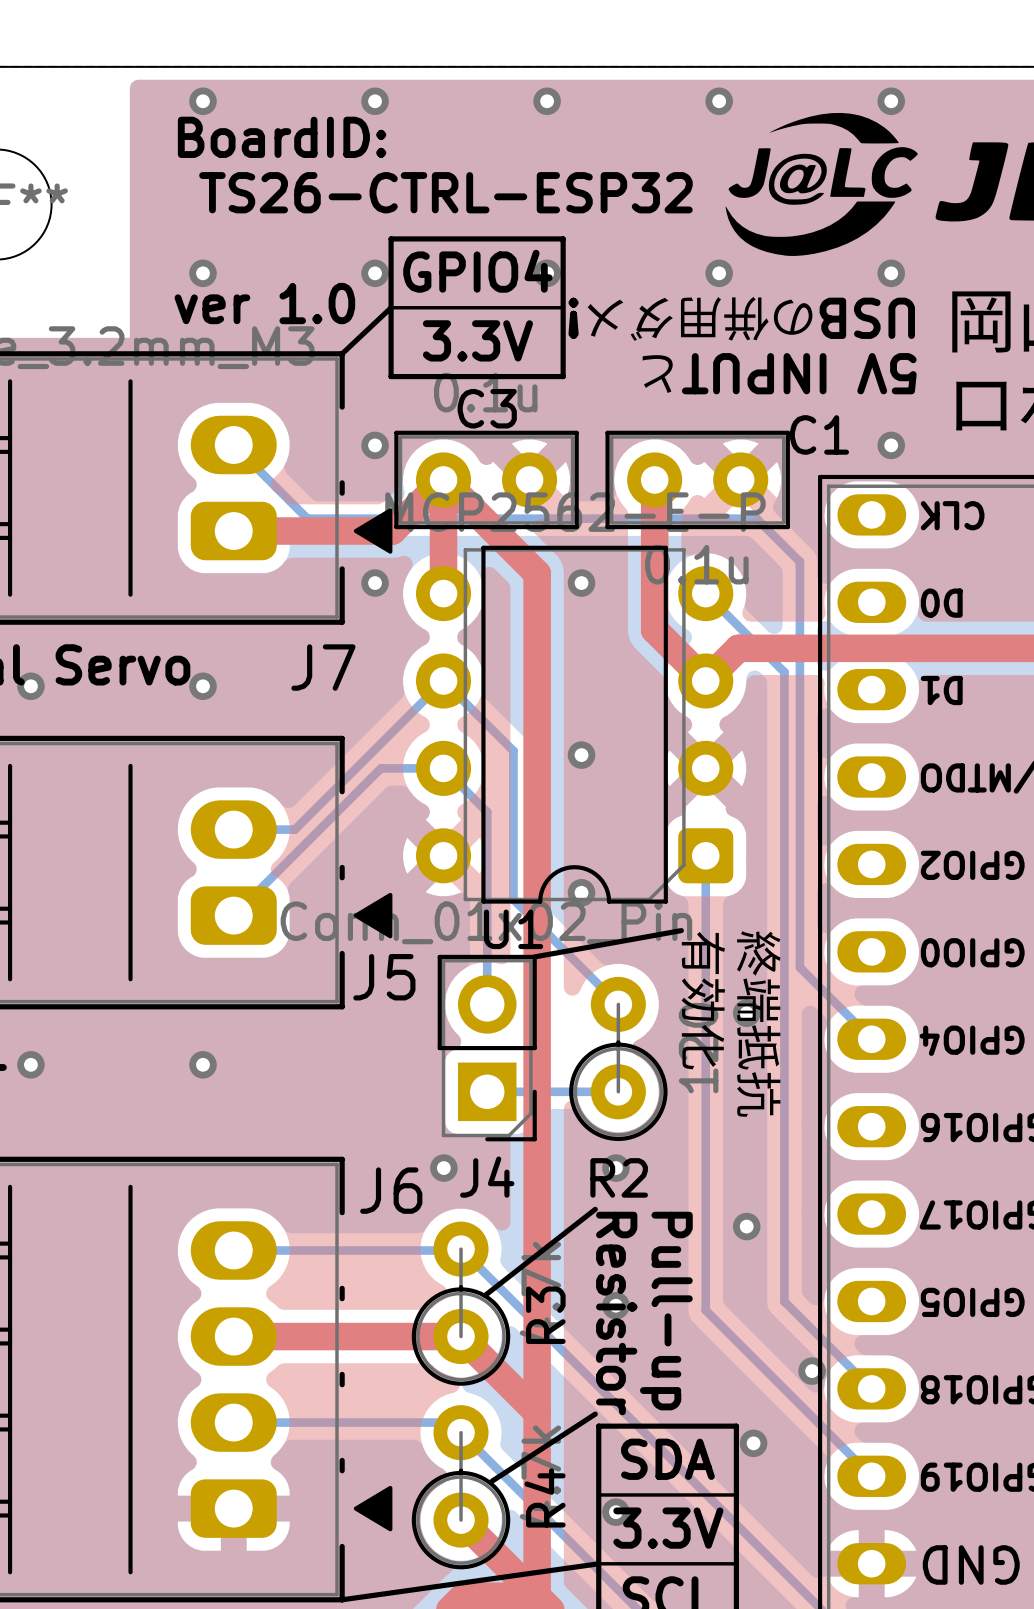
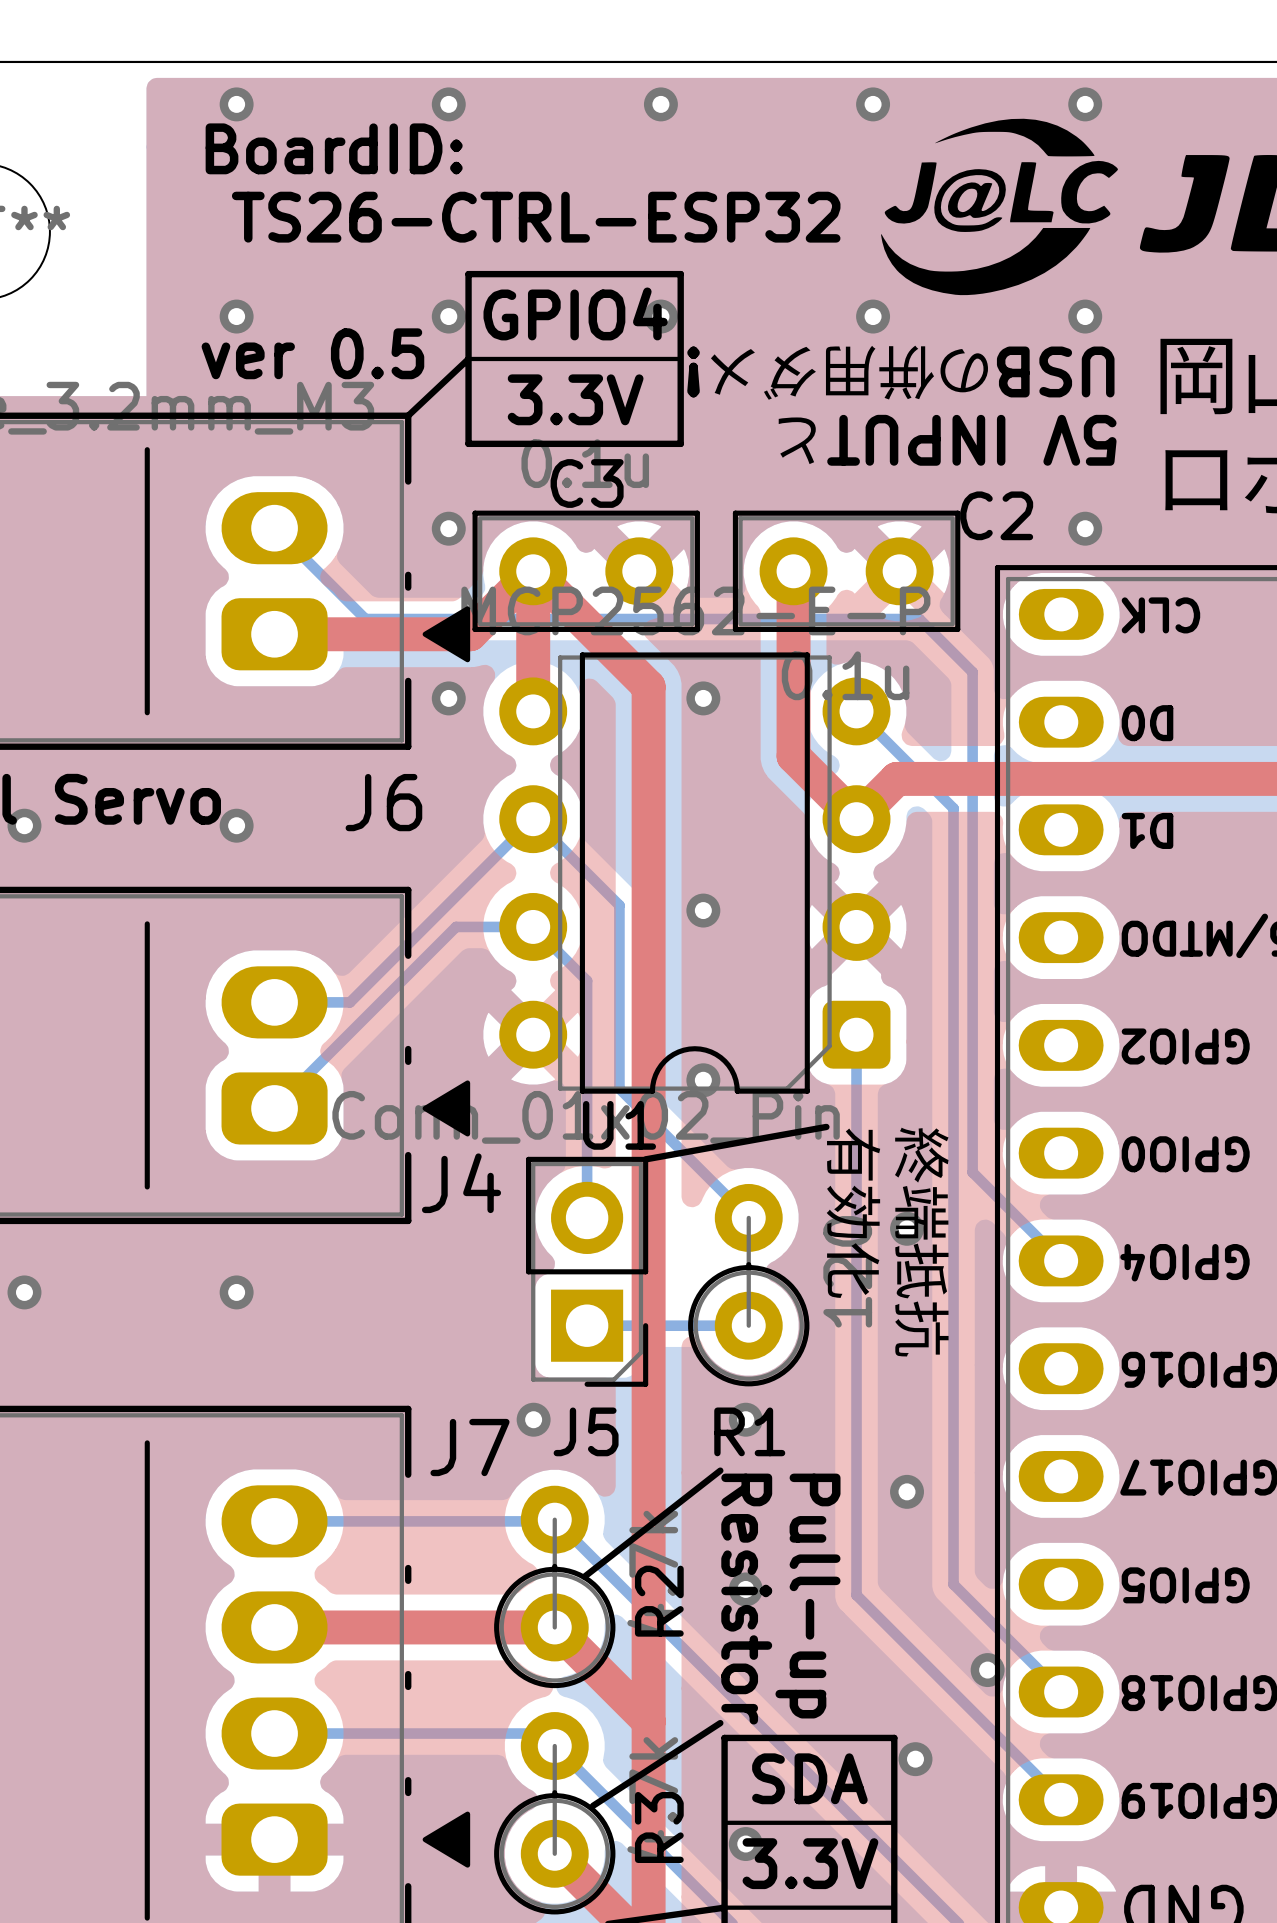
text: ver 1.0 (264, 303) -> ver 0.5 (312, 353)
C1 name: C1 (819, 434) -> C2 (996, 515)
J7 name: J7 (323, 667) -> J6 (383, 802)
J5 name: J5 (384, 977) -> J4 (461, 1183)
J4 name: J4 (487, 1177) -> J5 (586, 1431)
R2 name: R2 (619, 1177) -> R1 (749, 1431)
J6 name: J6 (391, 1190) -> J7 (469, 1447)
R3 name: R3 (545, 1315) -> R2 (659, 1601)
R4 name: R4 (545, 1497) -> R3 (659, 1827)

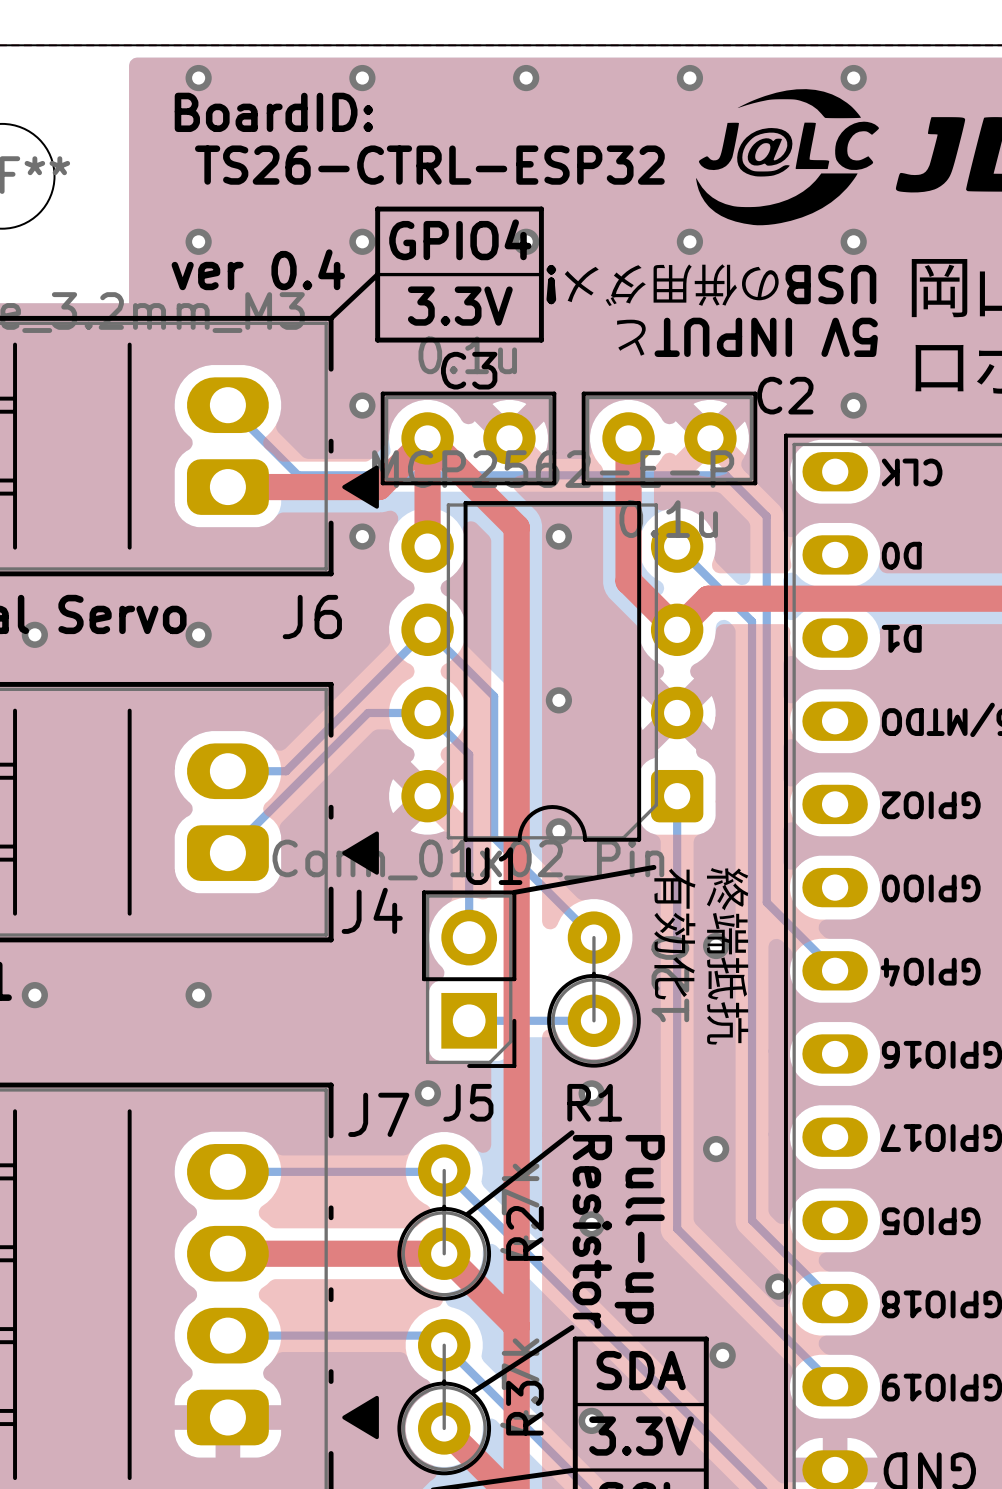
text: ver 0.5 (312, 353) -> ver 0.4 (258, 269)

